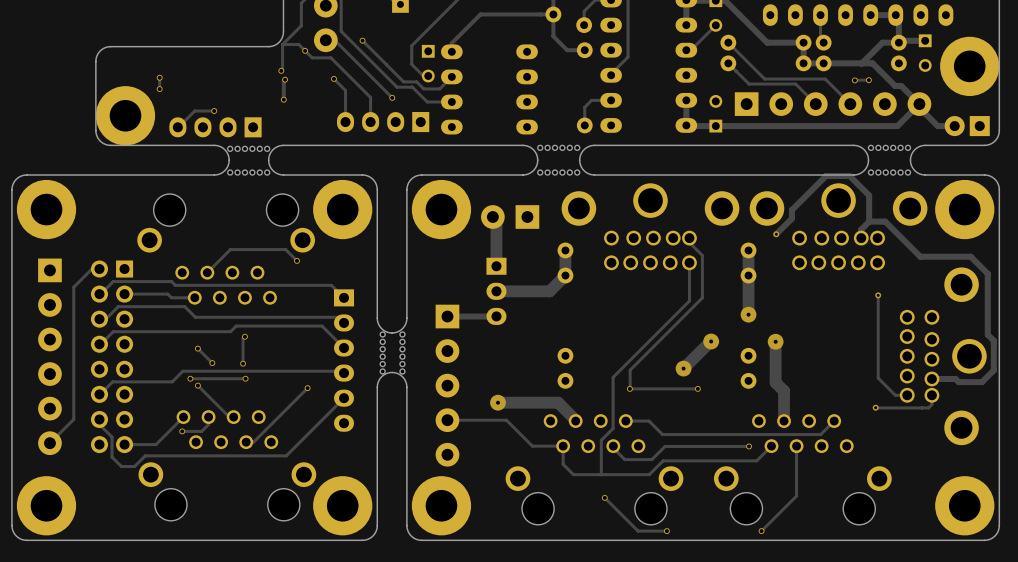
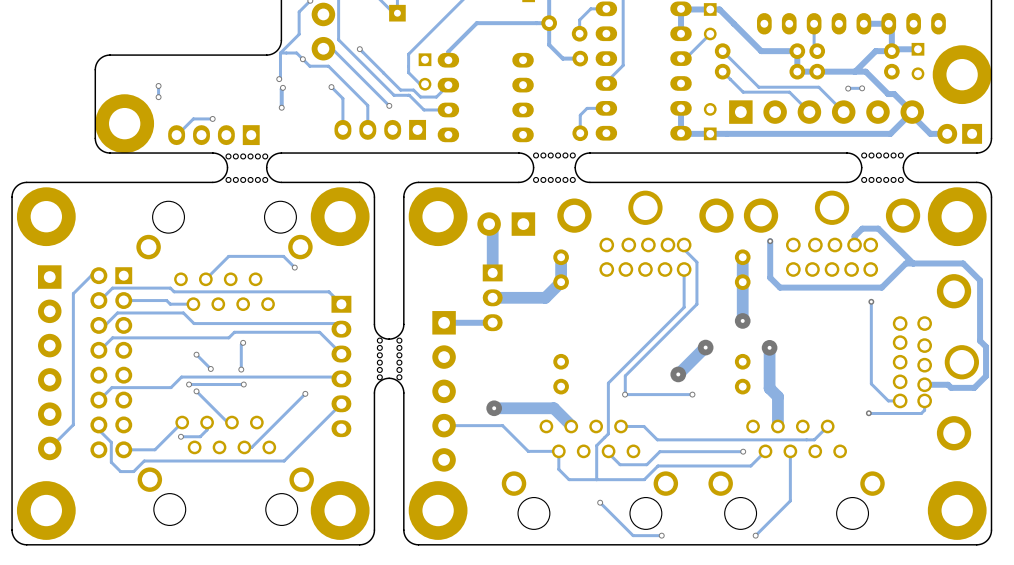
track: (869, 221) (869, 195) (849, 175) (826, 175) (791, 210) (791, 218) (776, 234) -> (913, 263) (905, 263) (881, 287) (780, 287) (770, 277) (770, 241)

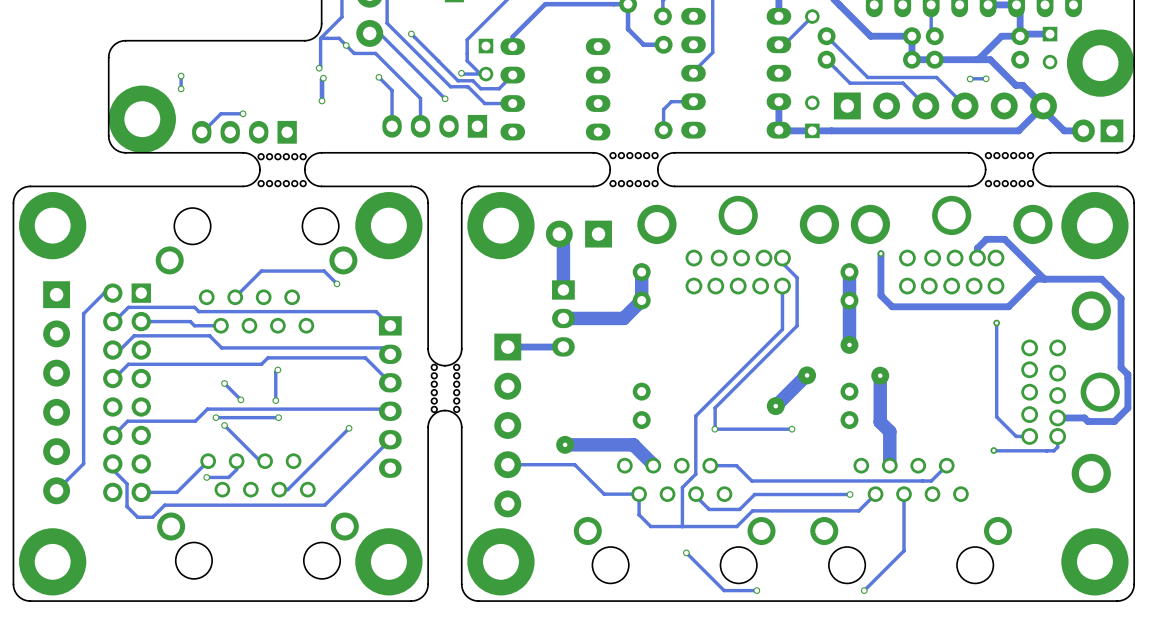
track: none -> (461, 73) (480, 74)
via: none -> (461, 73)

